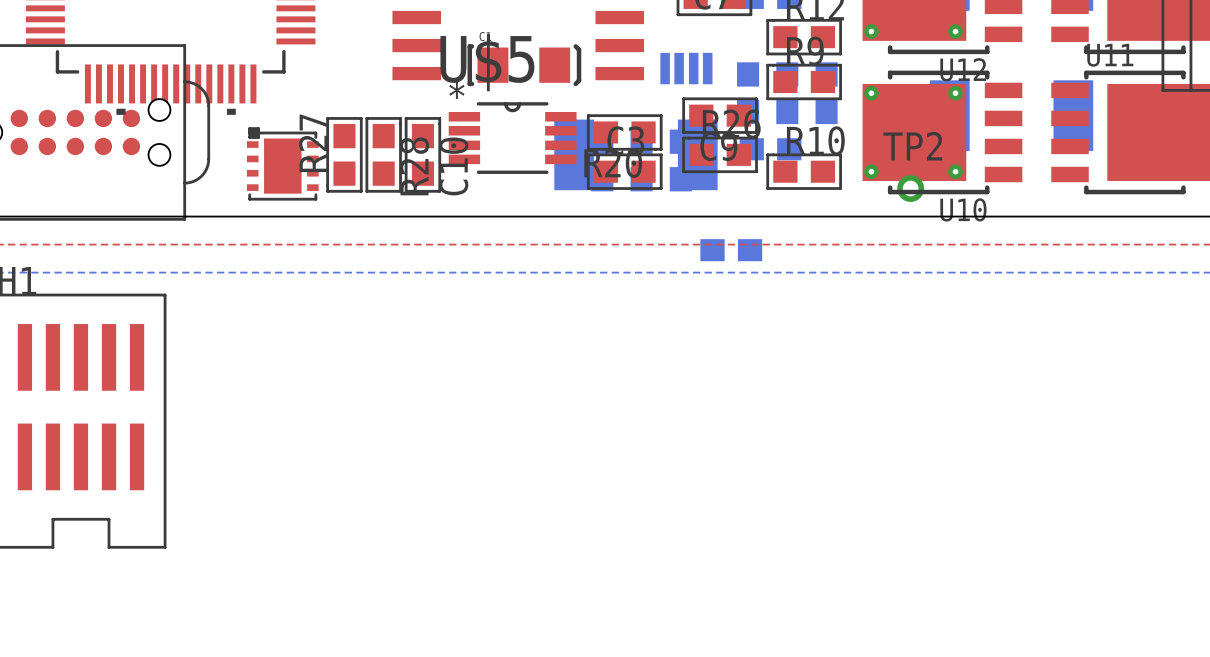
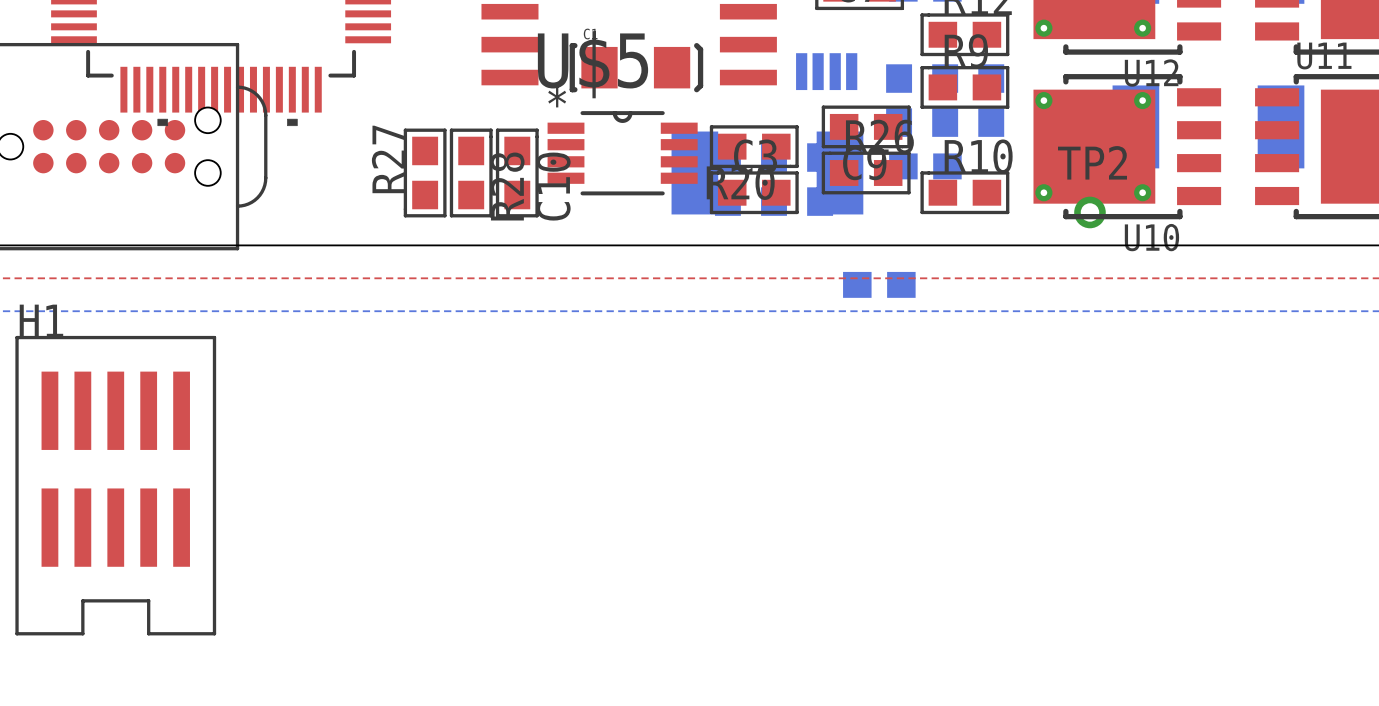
part: (282, 163) -> none

